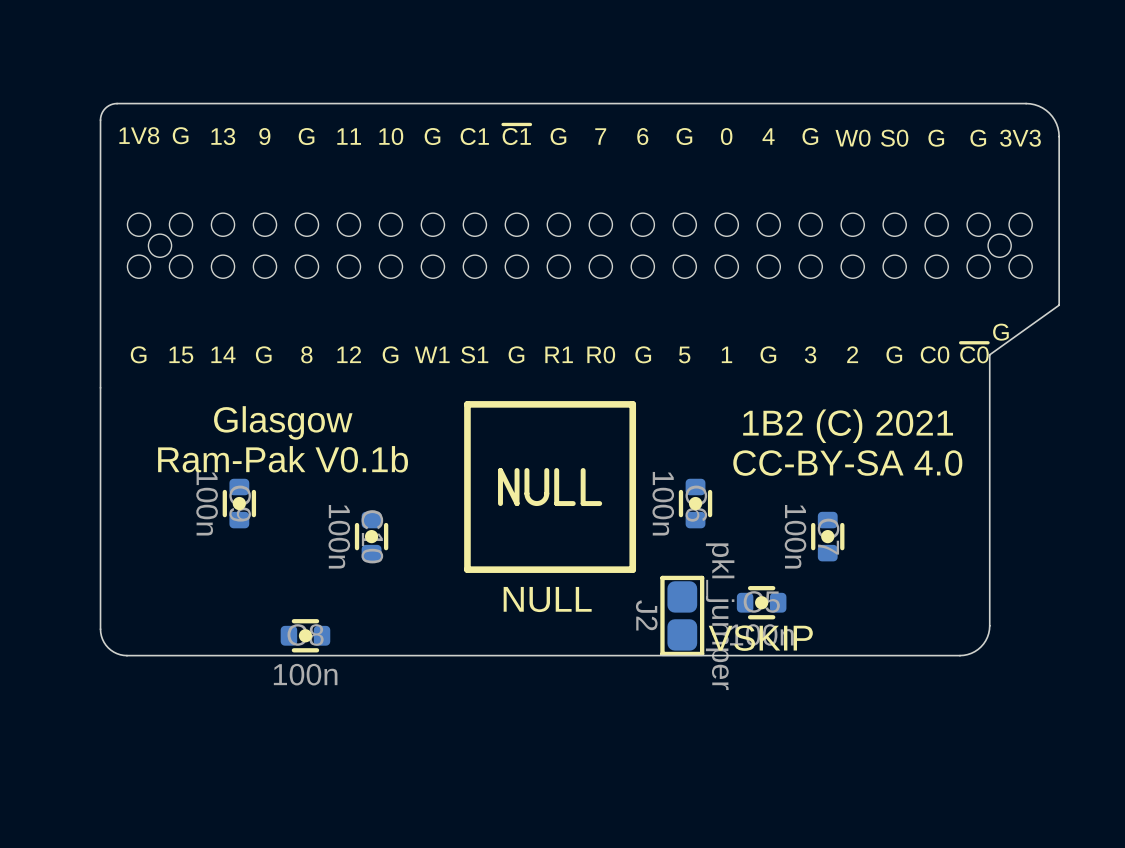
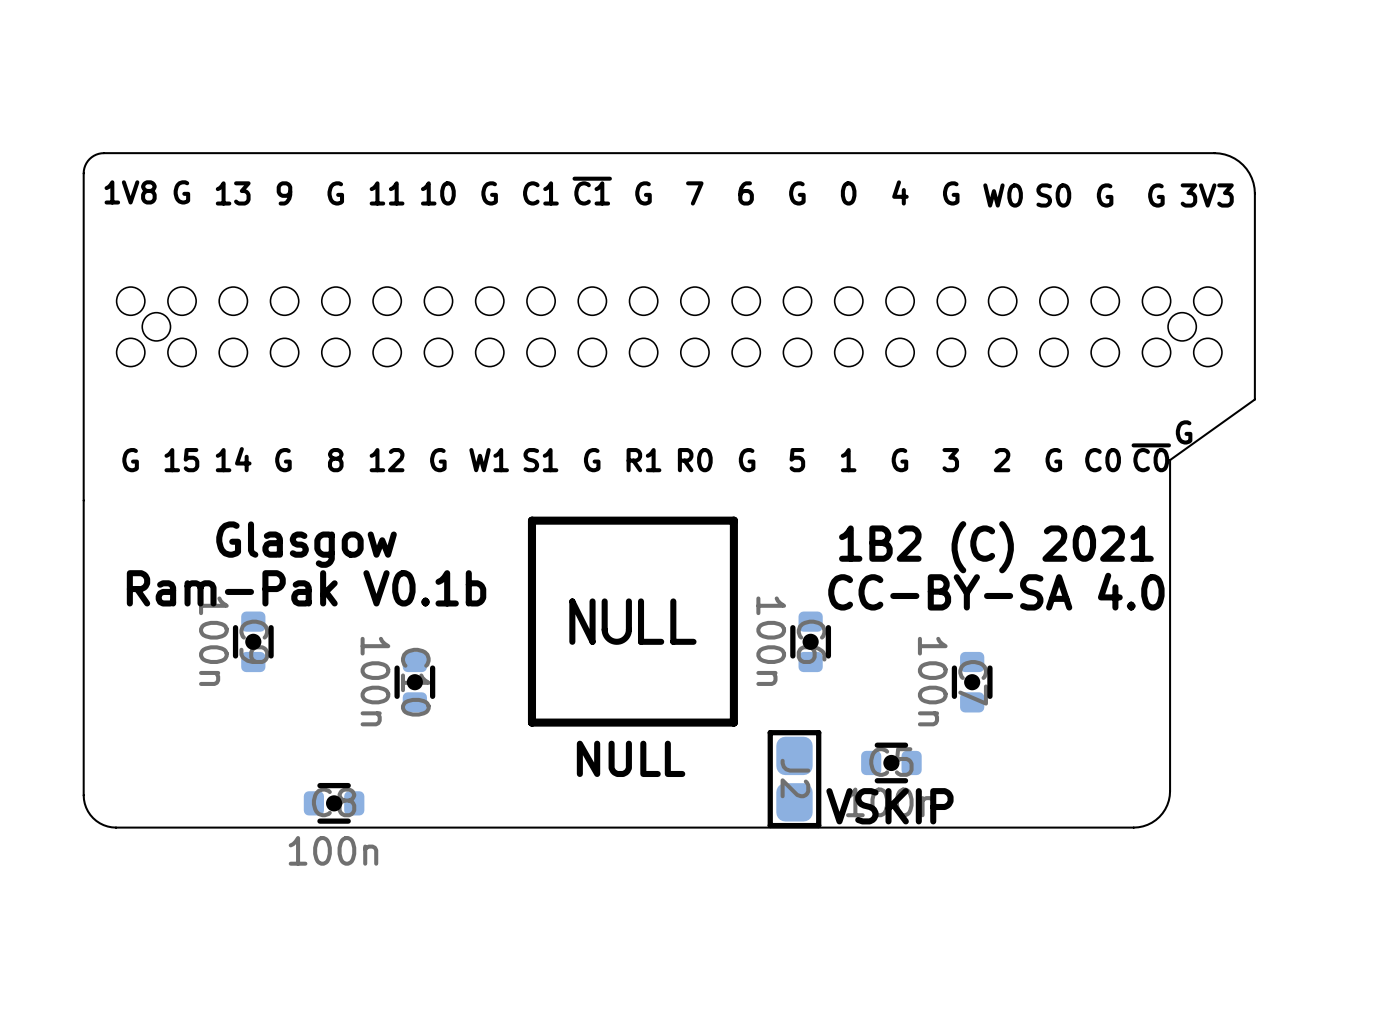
J2 name position: J2 (646, 615) -> J2 (795, 778)
J2 value: pkl_jumper (720, 616) -> none

